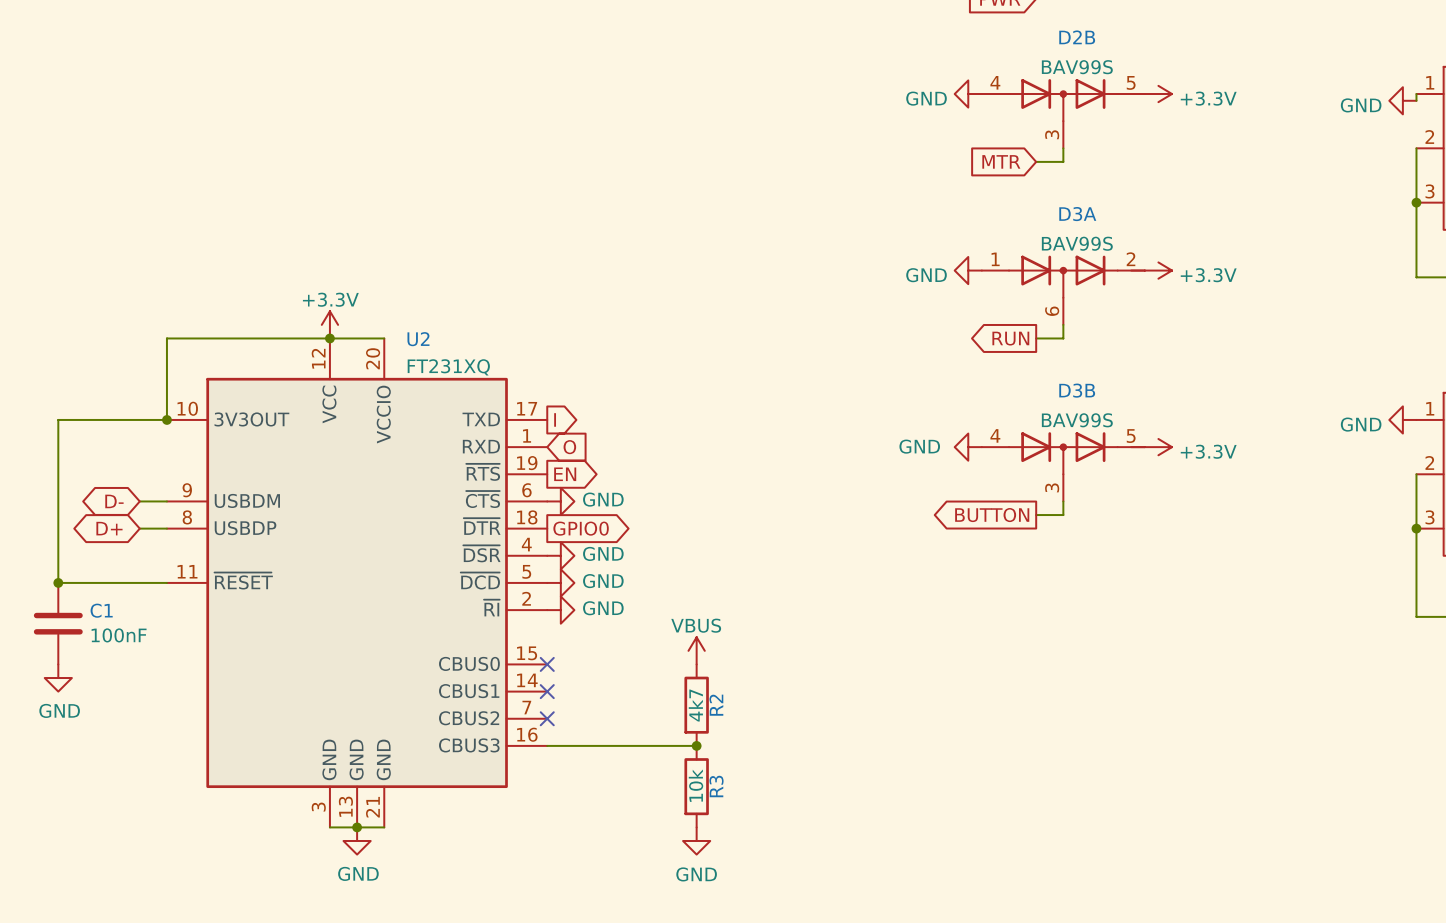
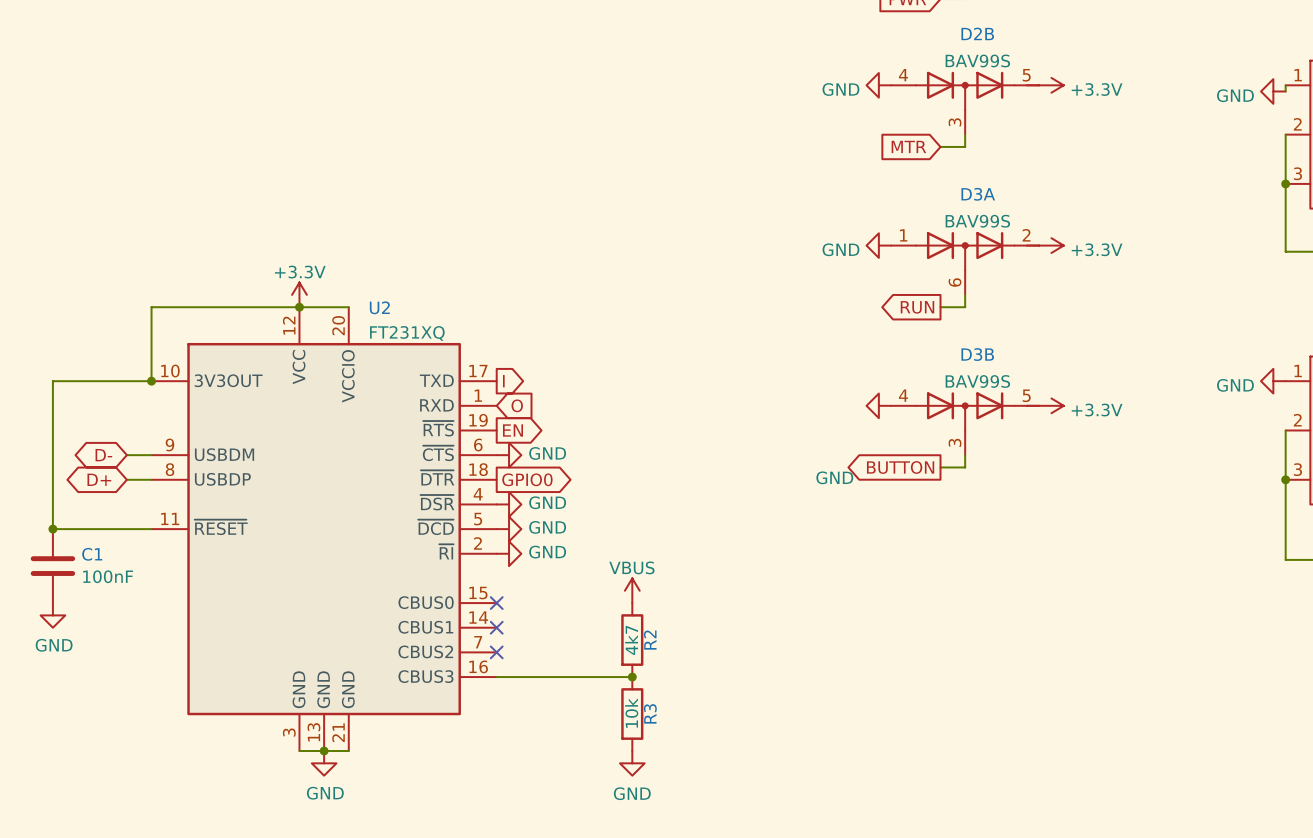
power symbol text position: GND (919, 446) -> GND (834, 477)

